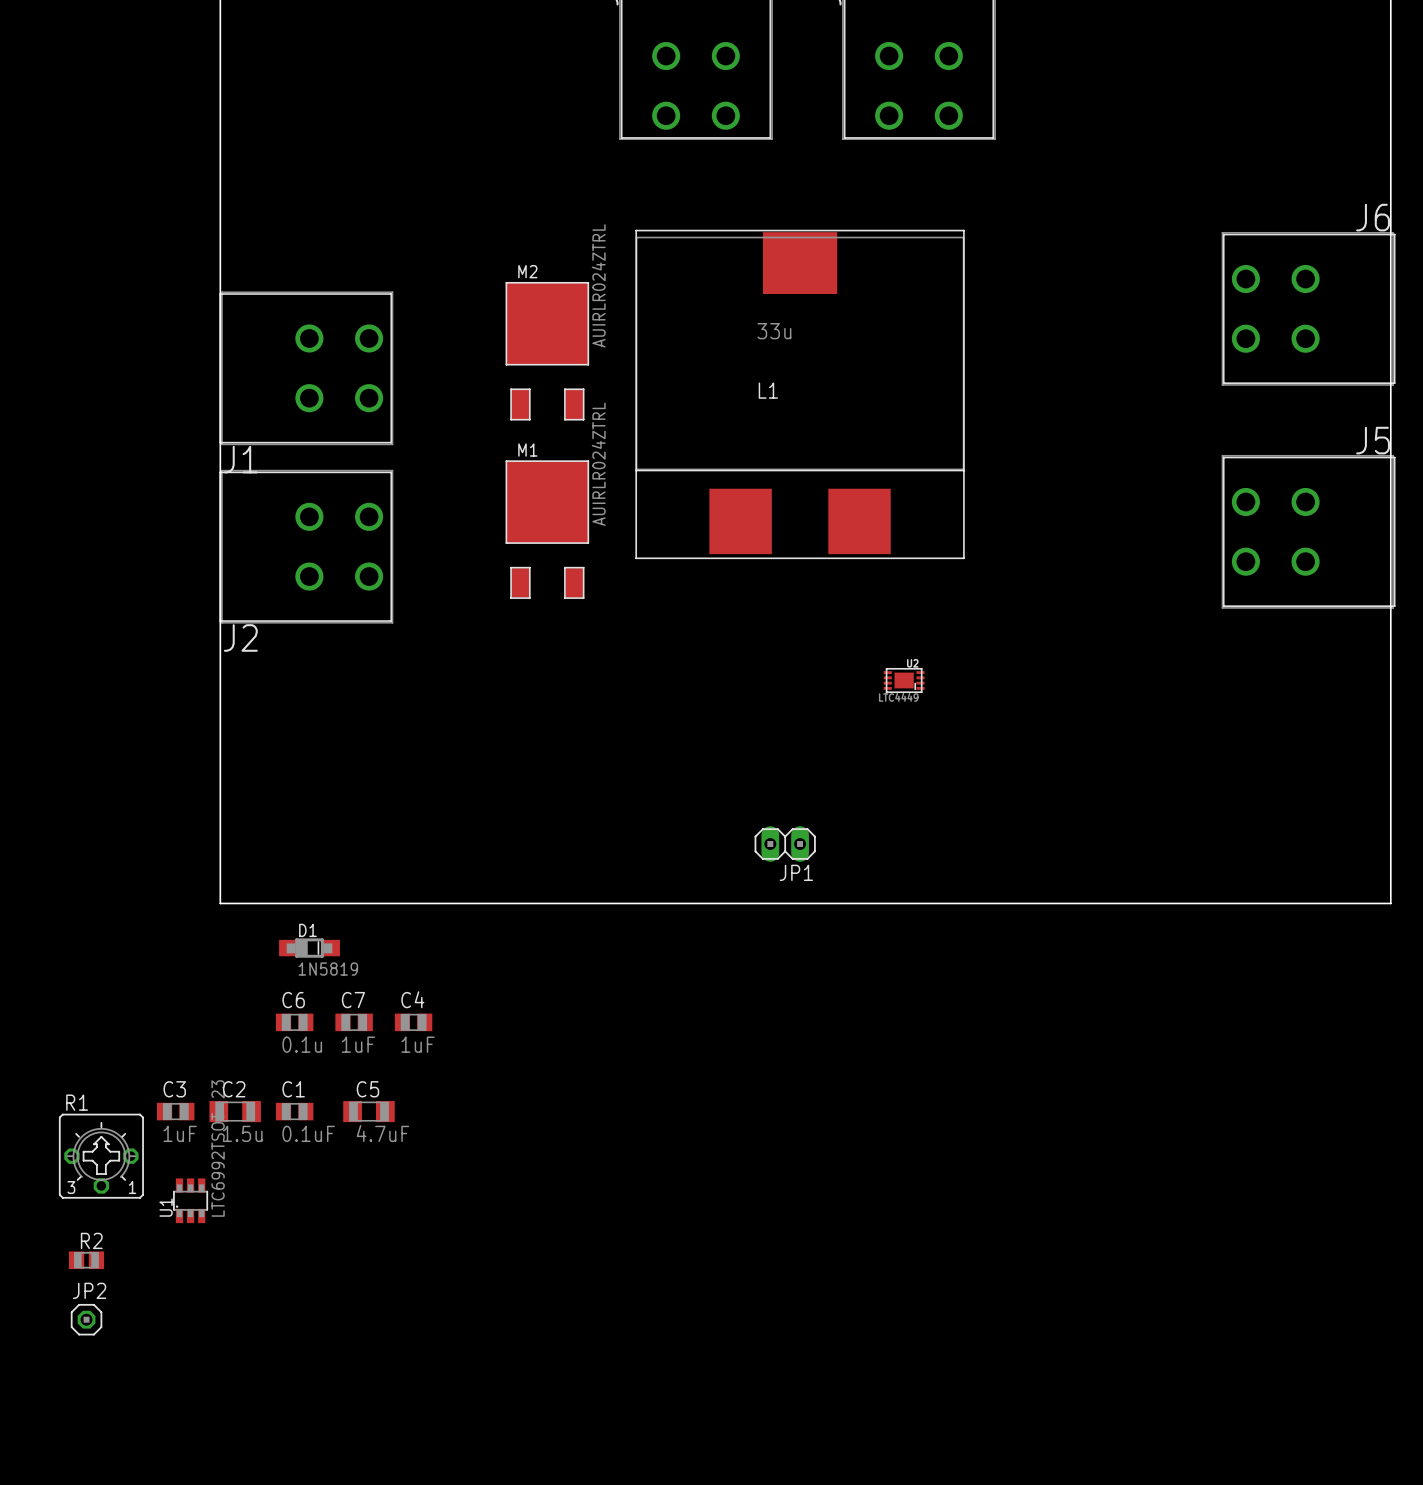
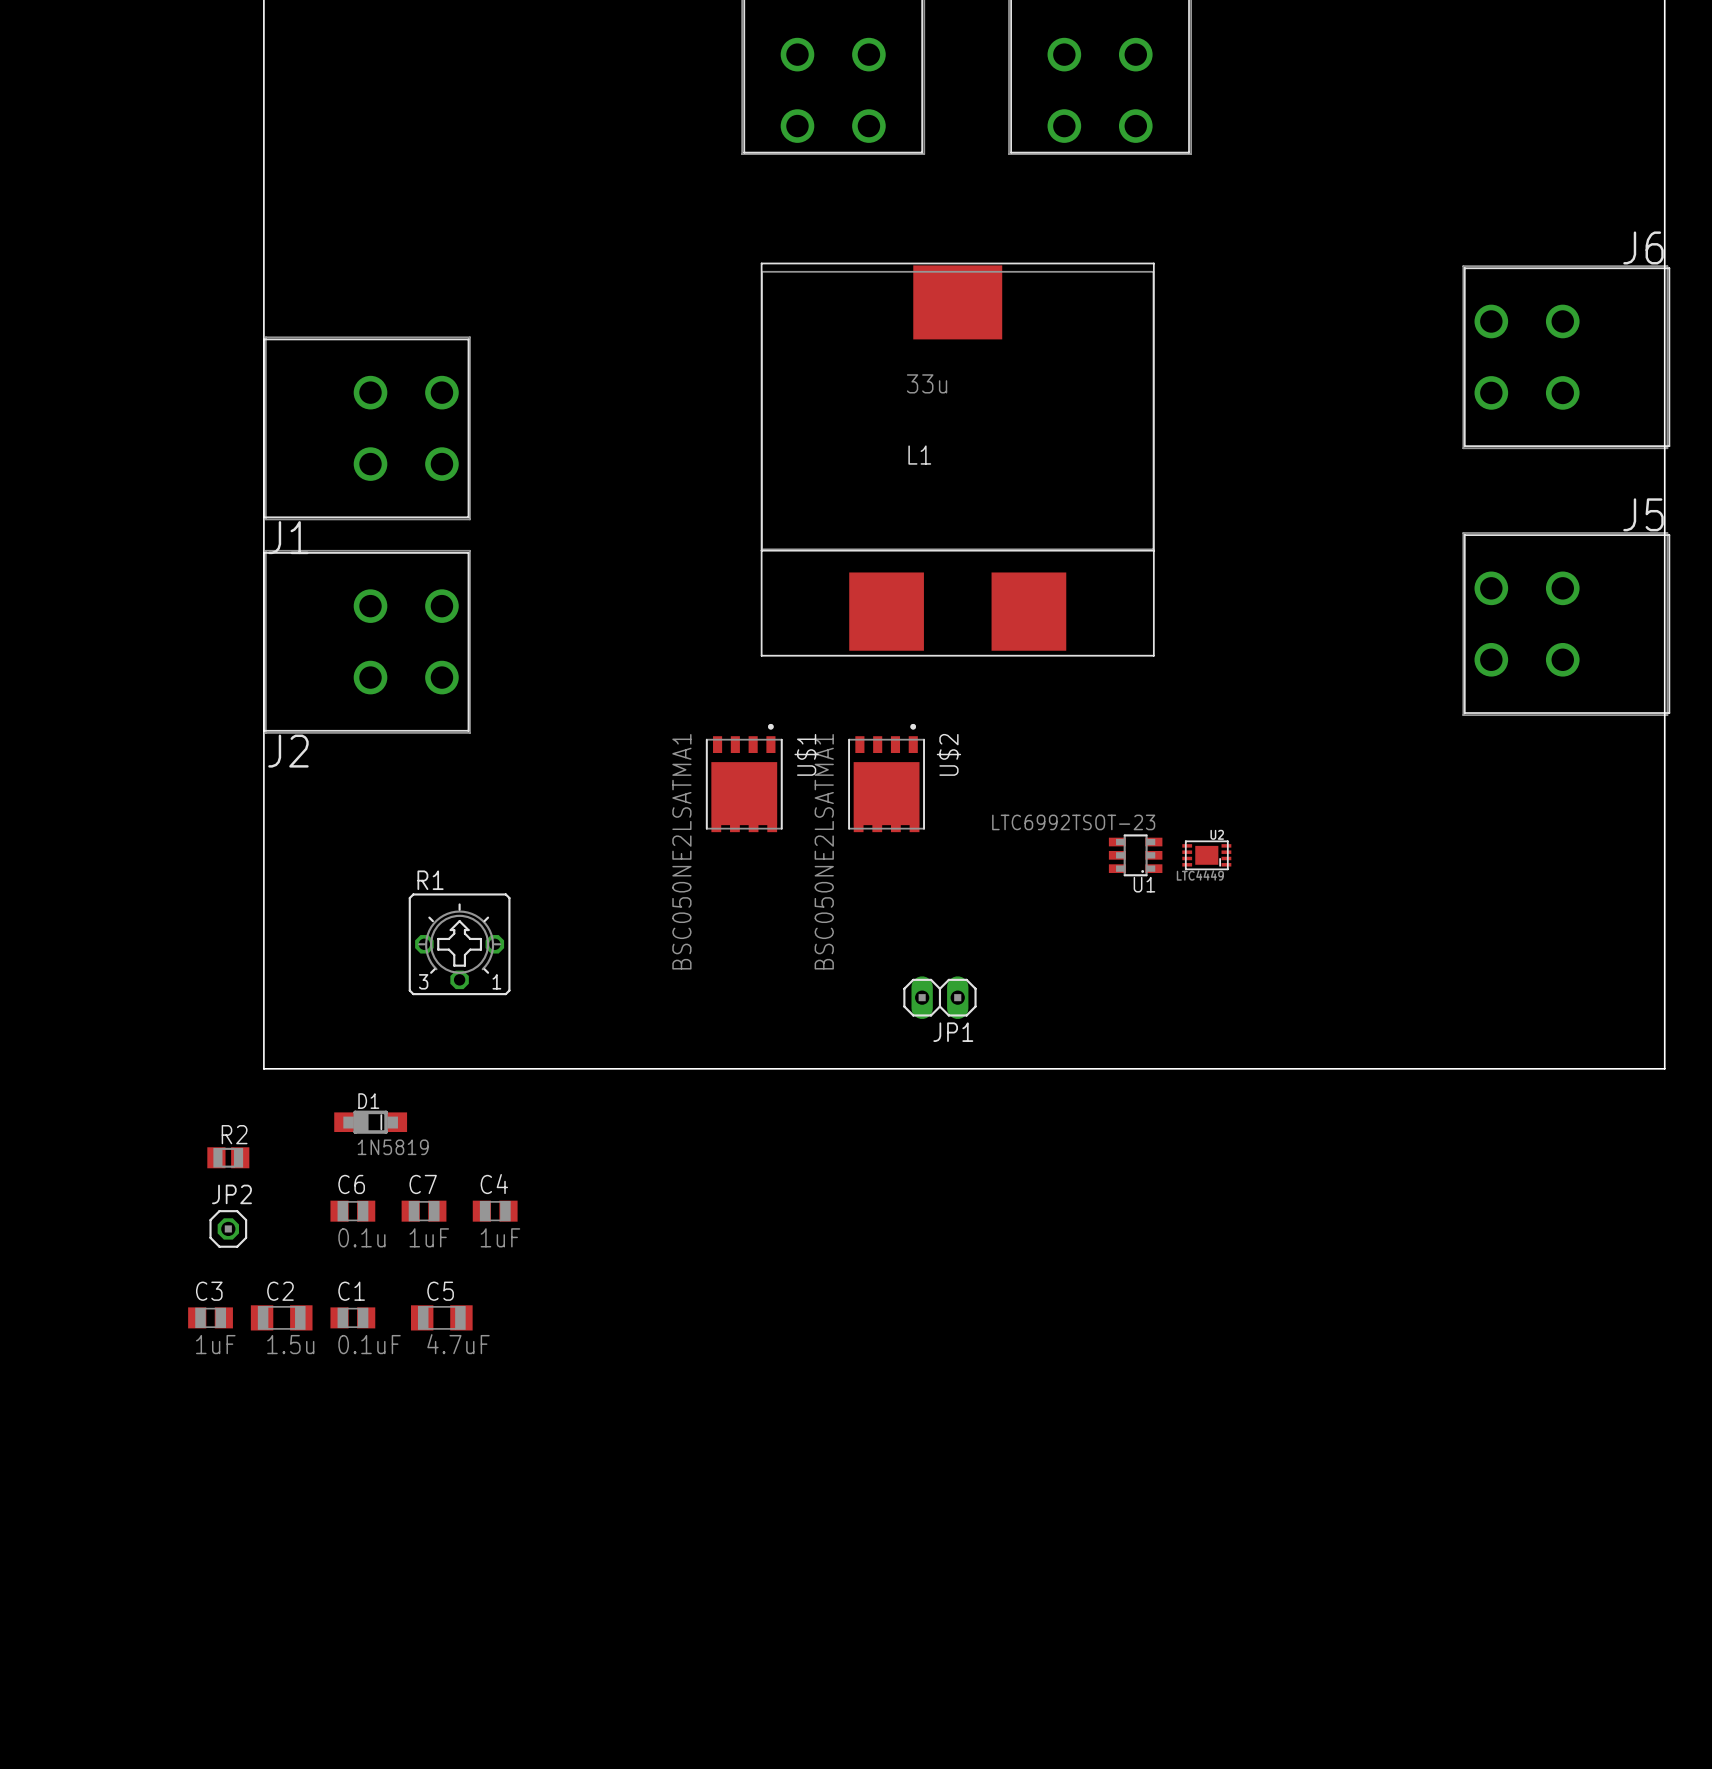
M2: AUIRLR024ZTRL (547, 351) -> none
M1: AUIRLR024ZTRL (547, 529) -> none
U$1: none -> BSC050NE2LSATMA1 (744, 778)
U$2: none -> BSC050NE2LSATMA1 (886, 778)
U2 position: (904, 680) -> (1206, 855)
R1 position: (101, 1156) -> (459, 944)
U1 rotation: 0° (190, 1200) -> 90° counterclockwise (1135, 855)
U1 position: (190, 1200) -> (1135, 855)
R2 position: (86, 1260) -> (228, 1157)
JP2 position: (86, 1319) -> (228, 1228)

